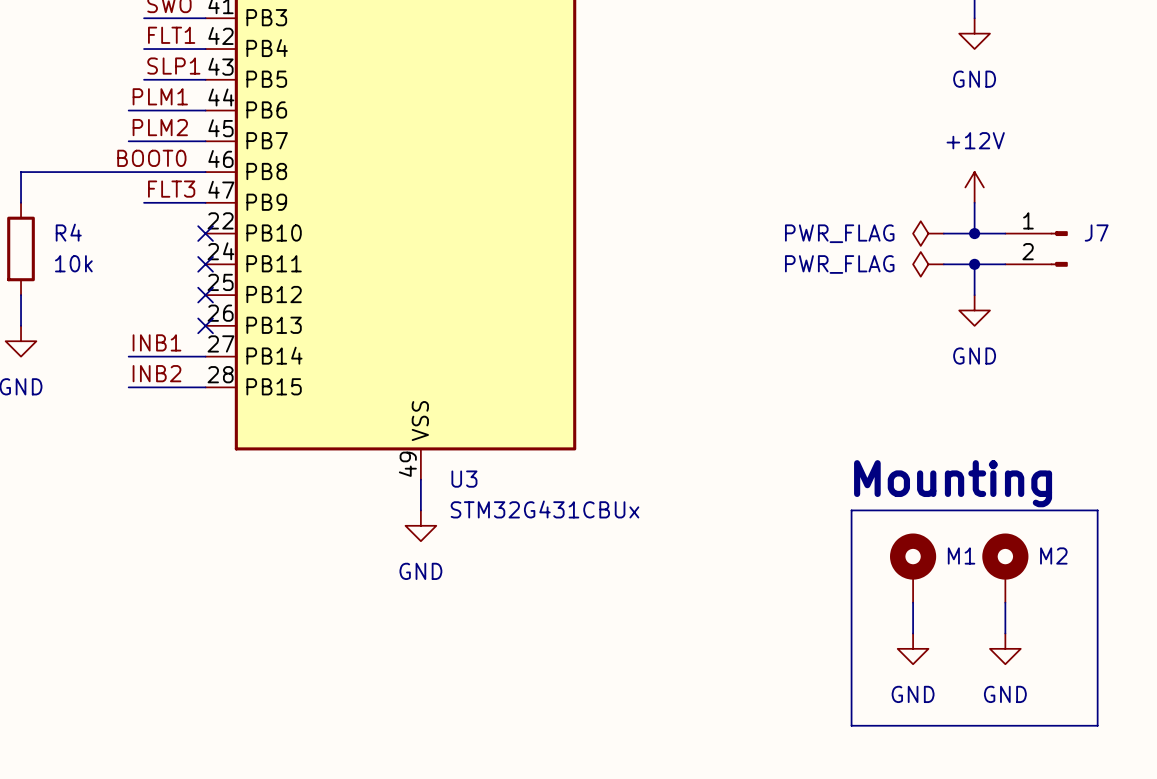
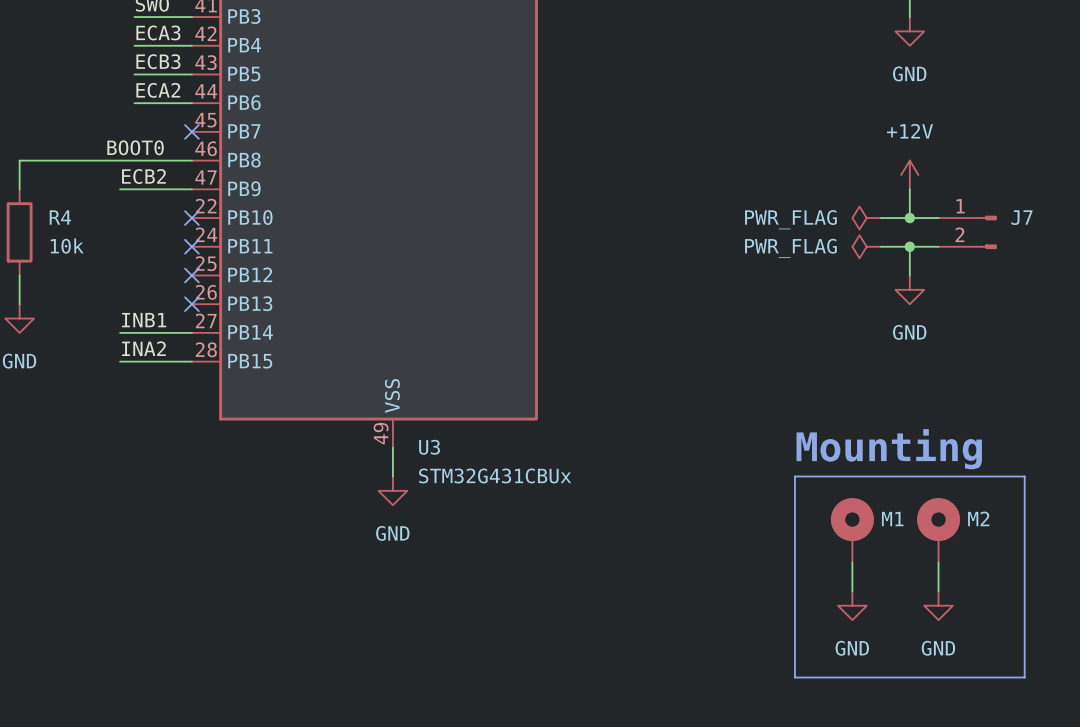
label: FLT1 (171, 35) -> ECA3 (158, 32)
label: SLP1 (173, 66) -> ECB3 (158, 61)
label: PLM1 (160, 96) -> none
label: none -> ECA2 (158, 90)
wire: (128, 110) (144, 110) -> (120, 189) (134, 189)
label: PLM2 (160, 127) -> none
wire: (128, 141) (205, 141) -> none
no-connect mark: none -> (191, 131)
label: none -> ECB2 (143, 176)
label: FLT3 (171, 189) -> none
label: INB2 (156, 373) -> INA2 (143, 348)

